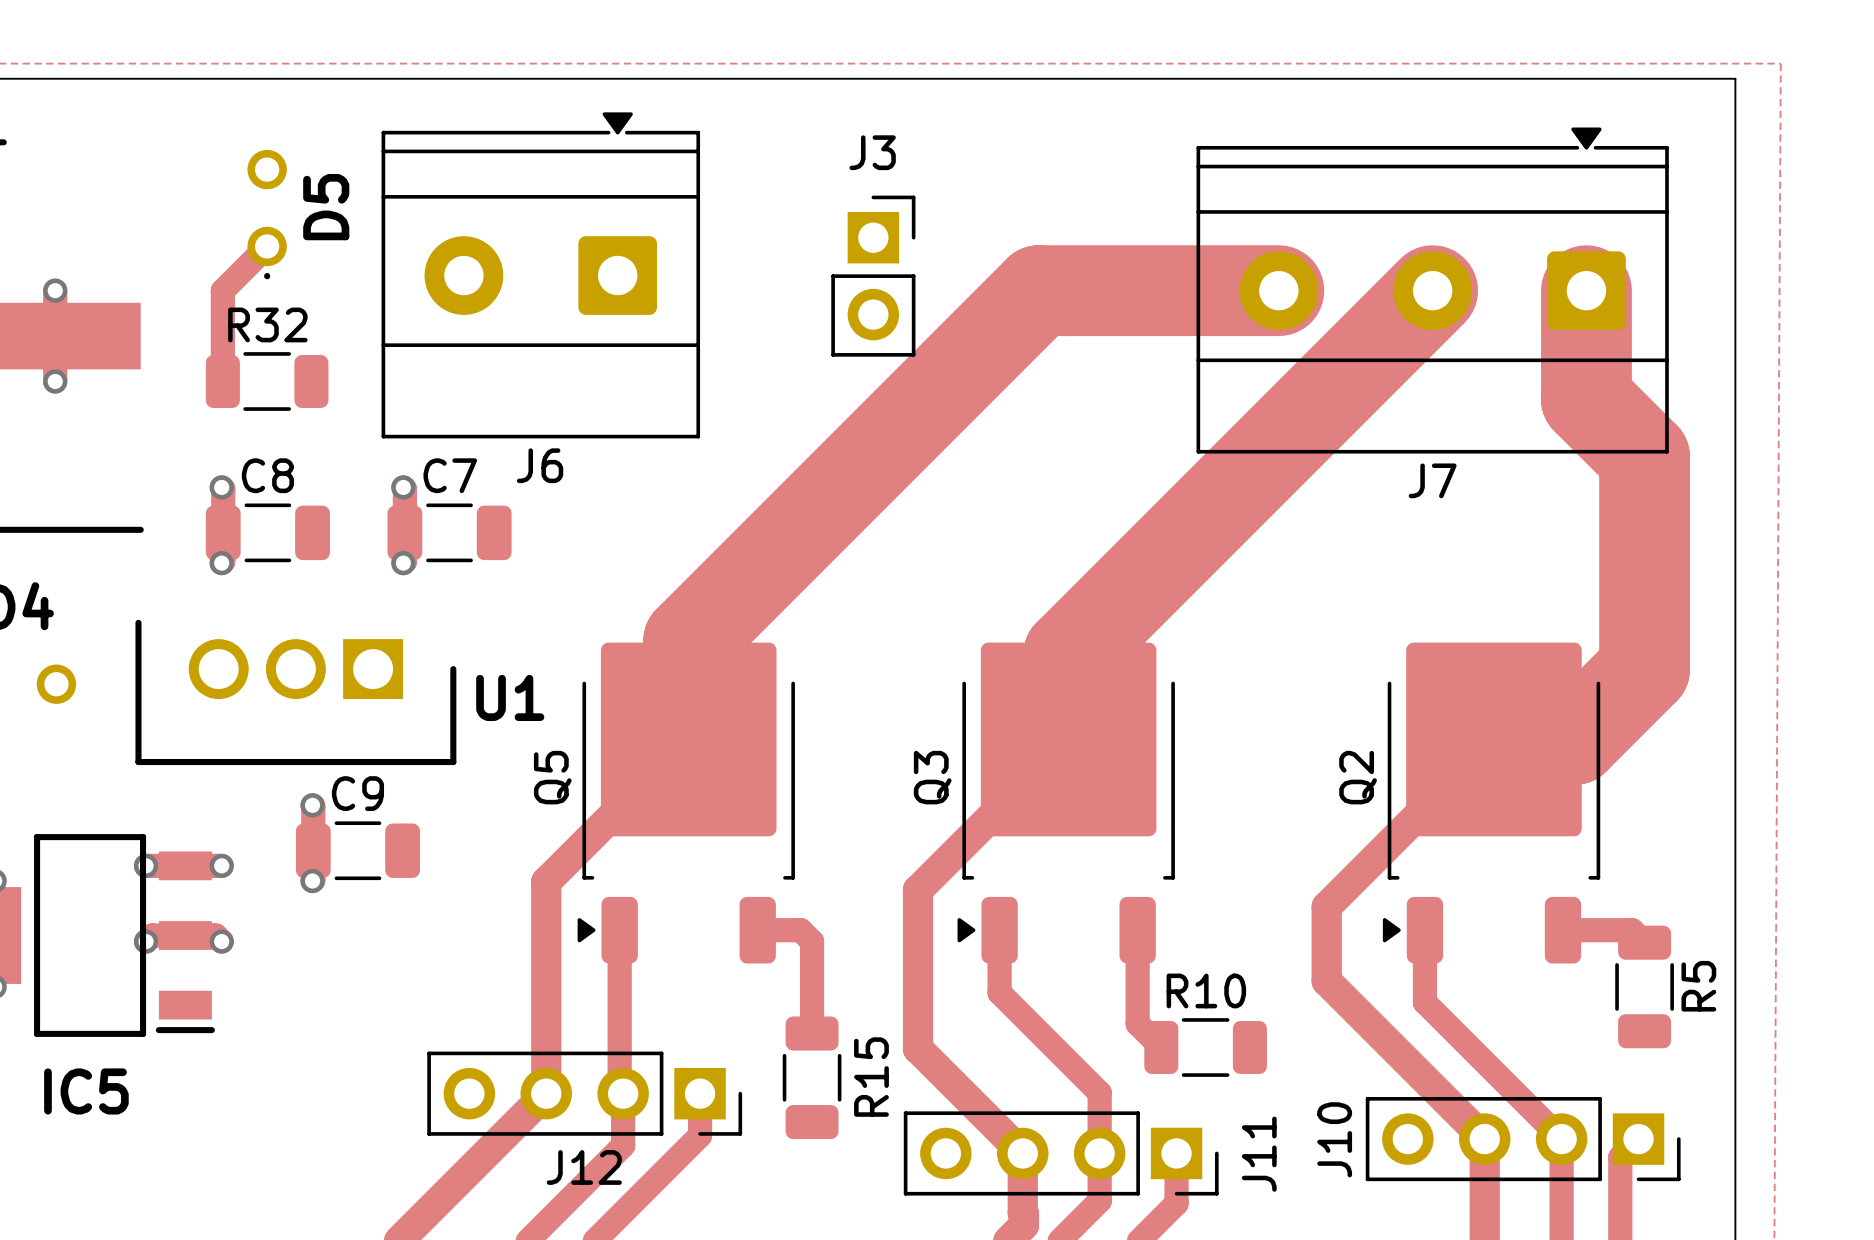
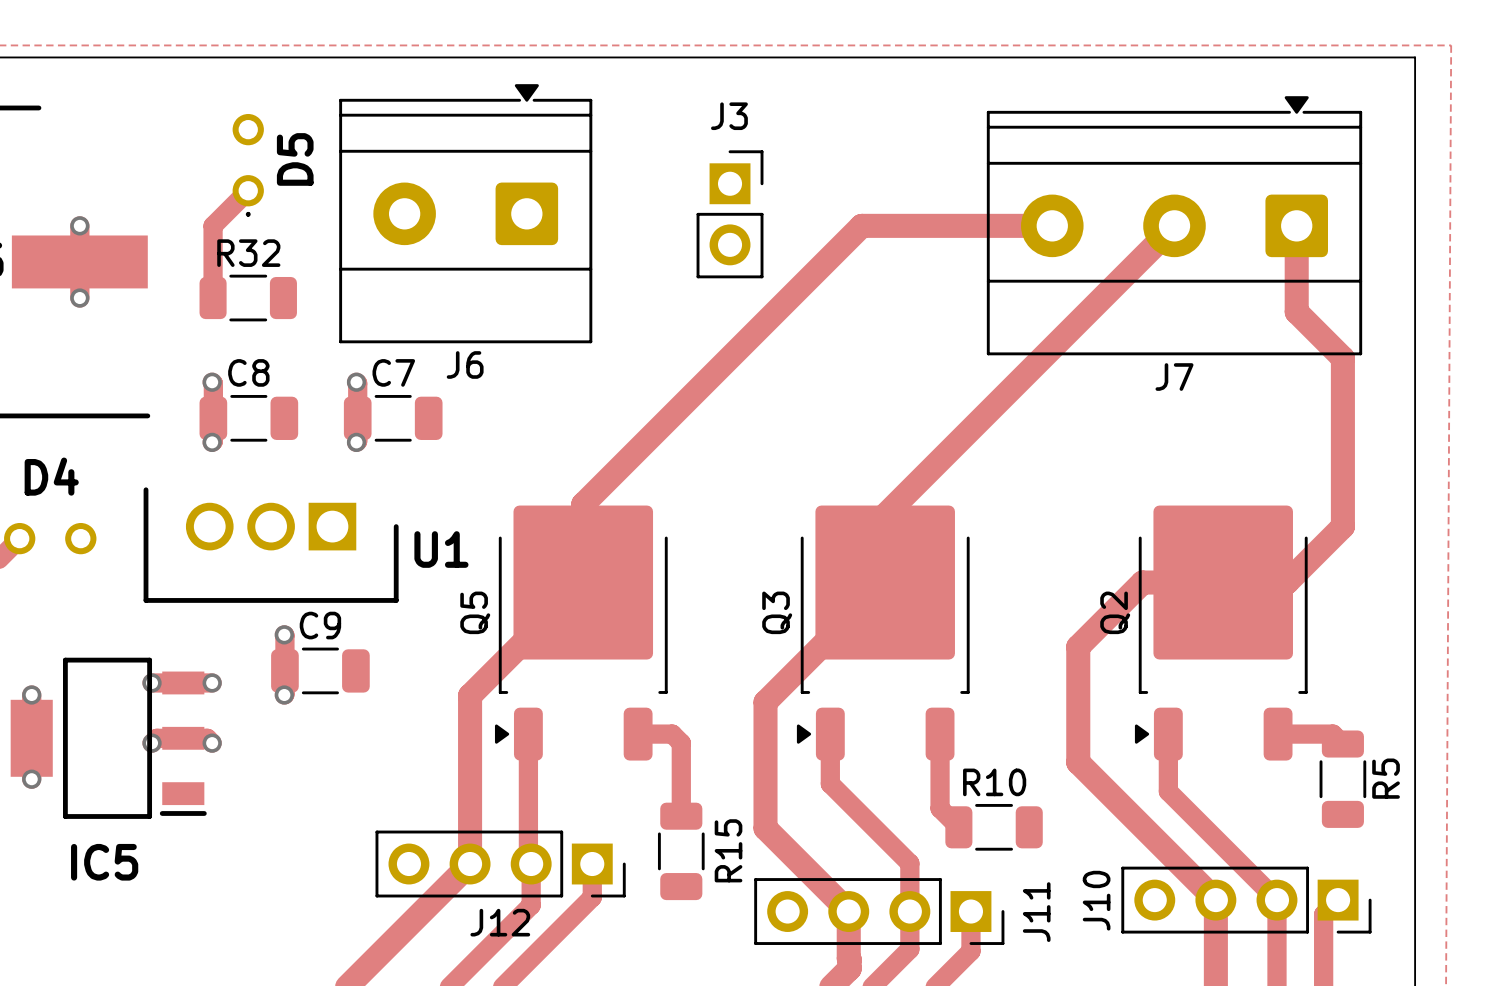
track width: thick (1278, 290) (1039, 290) (688, 641) (688, 739) -> thin (1052, 225) (861, 225) (583, 504) (583, 582)
track width: thick (1432, 290) (1068, 654) (1068, 739) -> thin (1174, 225) (885, 515) (885, 582)
track width: thick (1586, 290) (1586, 399) (1644, 457) (1644, 669) (1574, 739) (1493, 739) -> thin (1296, 225) (1296, 311) (1342, 358) (1342, 526) (1286, 582) (1223, 582)
track: (1493, 739) (1326, 906) (1326, 981) -> (1223, 582) (1142, 582) (1078, 646) (1078, 762) (1090, 774)

